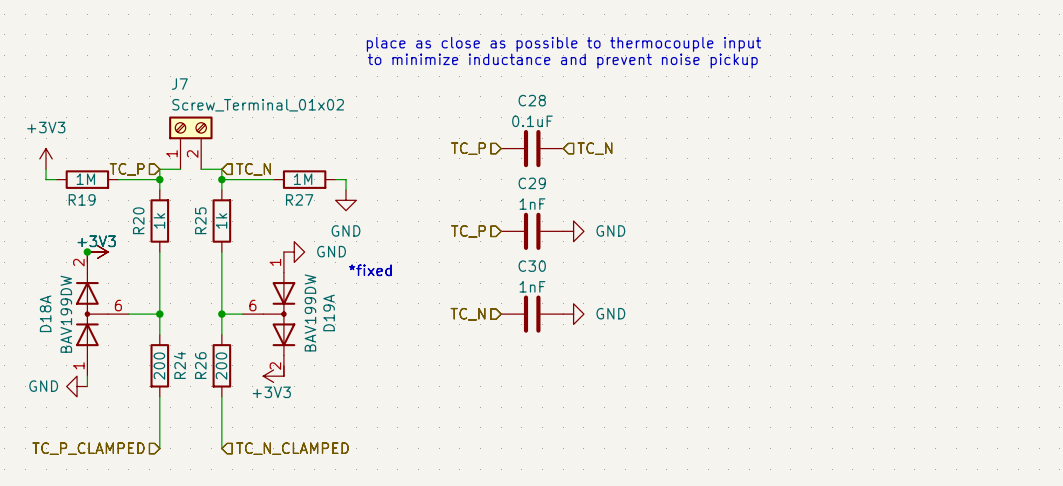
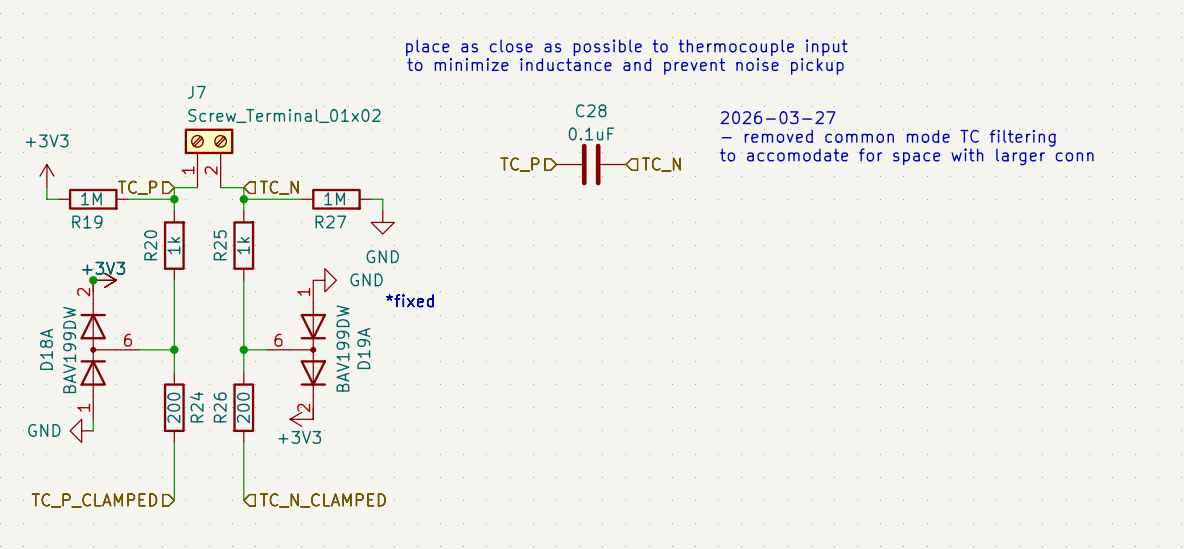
text: none -> 2026-03-27 (777, 117)
text: none -> - removed common mode TC filtering (888, 138)
text: none -> to accomodate for space with larger conn (906, 156)
hierarchical label: TC_P (468, 231) -> none
C29: 1nF (532, 231) -> none
power symbol: GND (573, 231) -> none
hierarchical label: TC_N (468, 314) -> none
C30: 1nF (532, 314) -> none
power symbol: GND (573, 314) -> none

